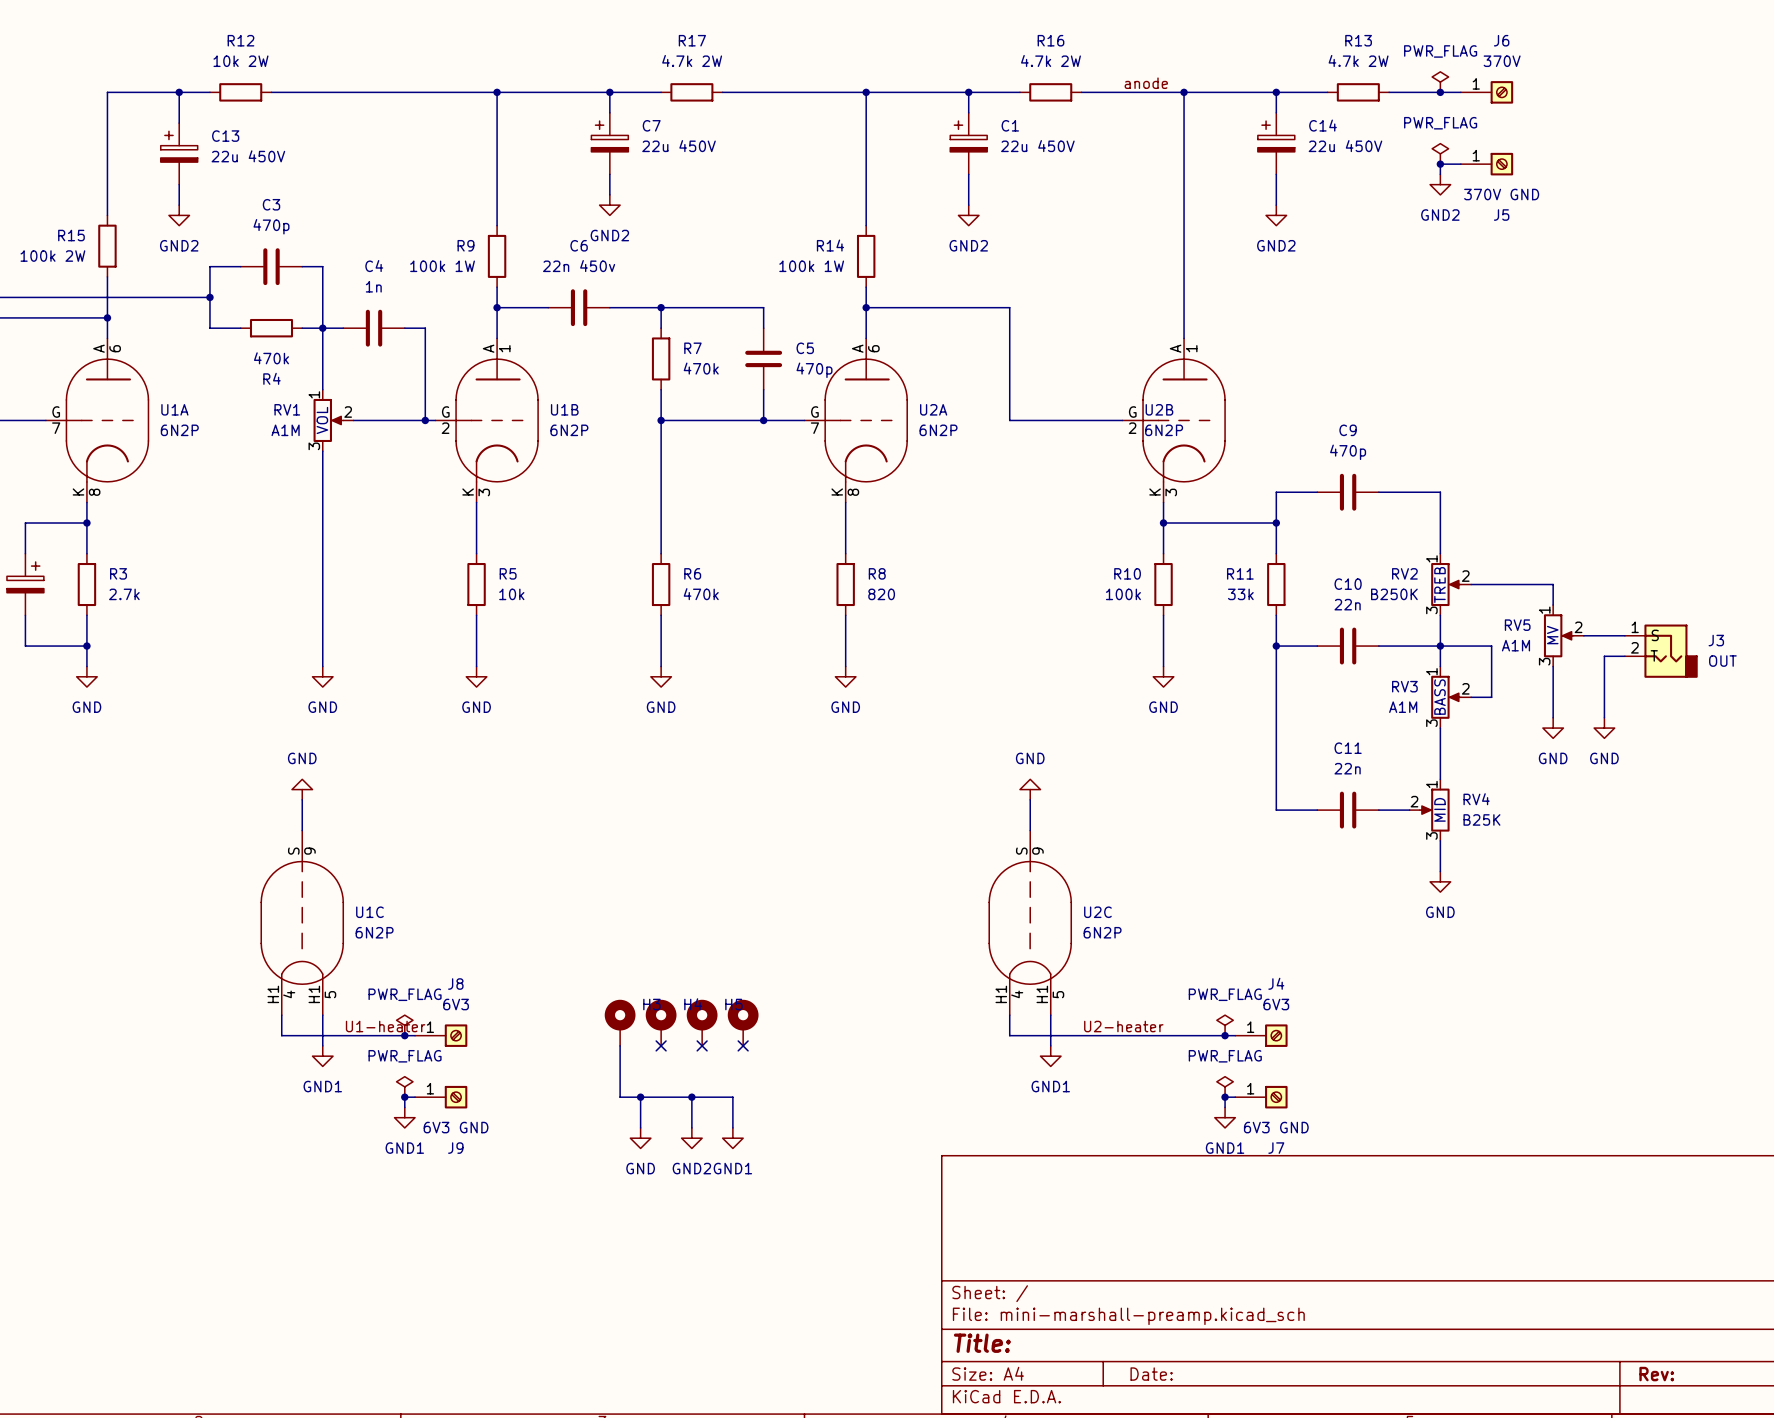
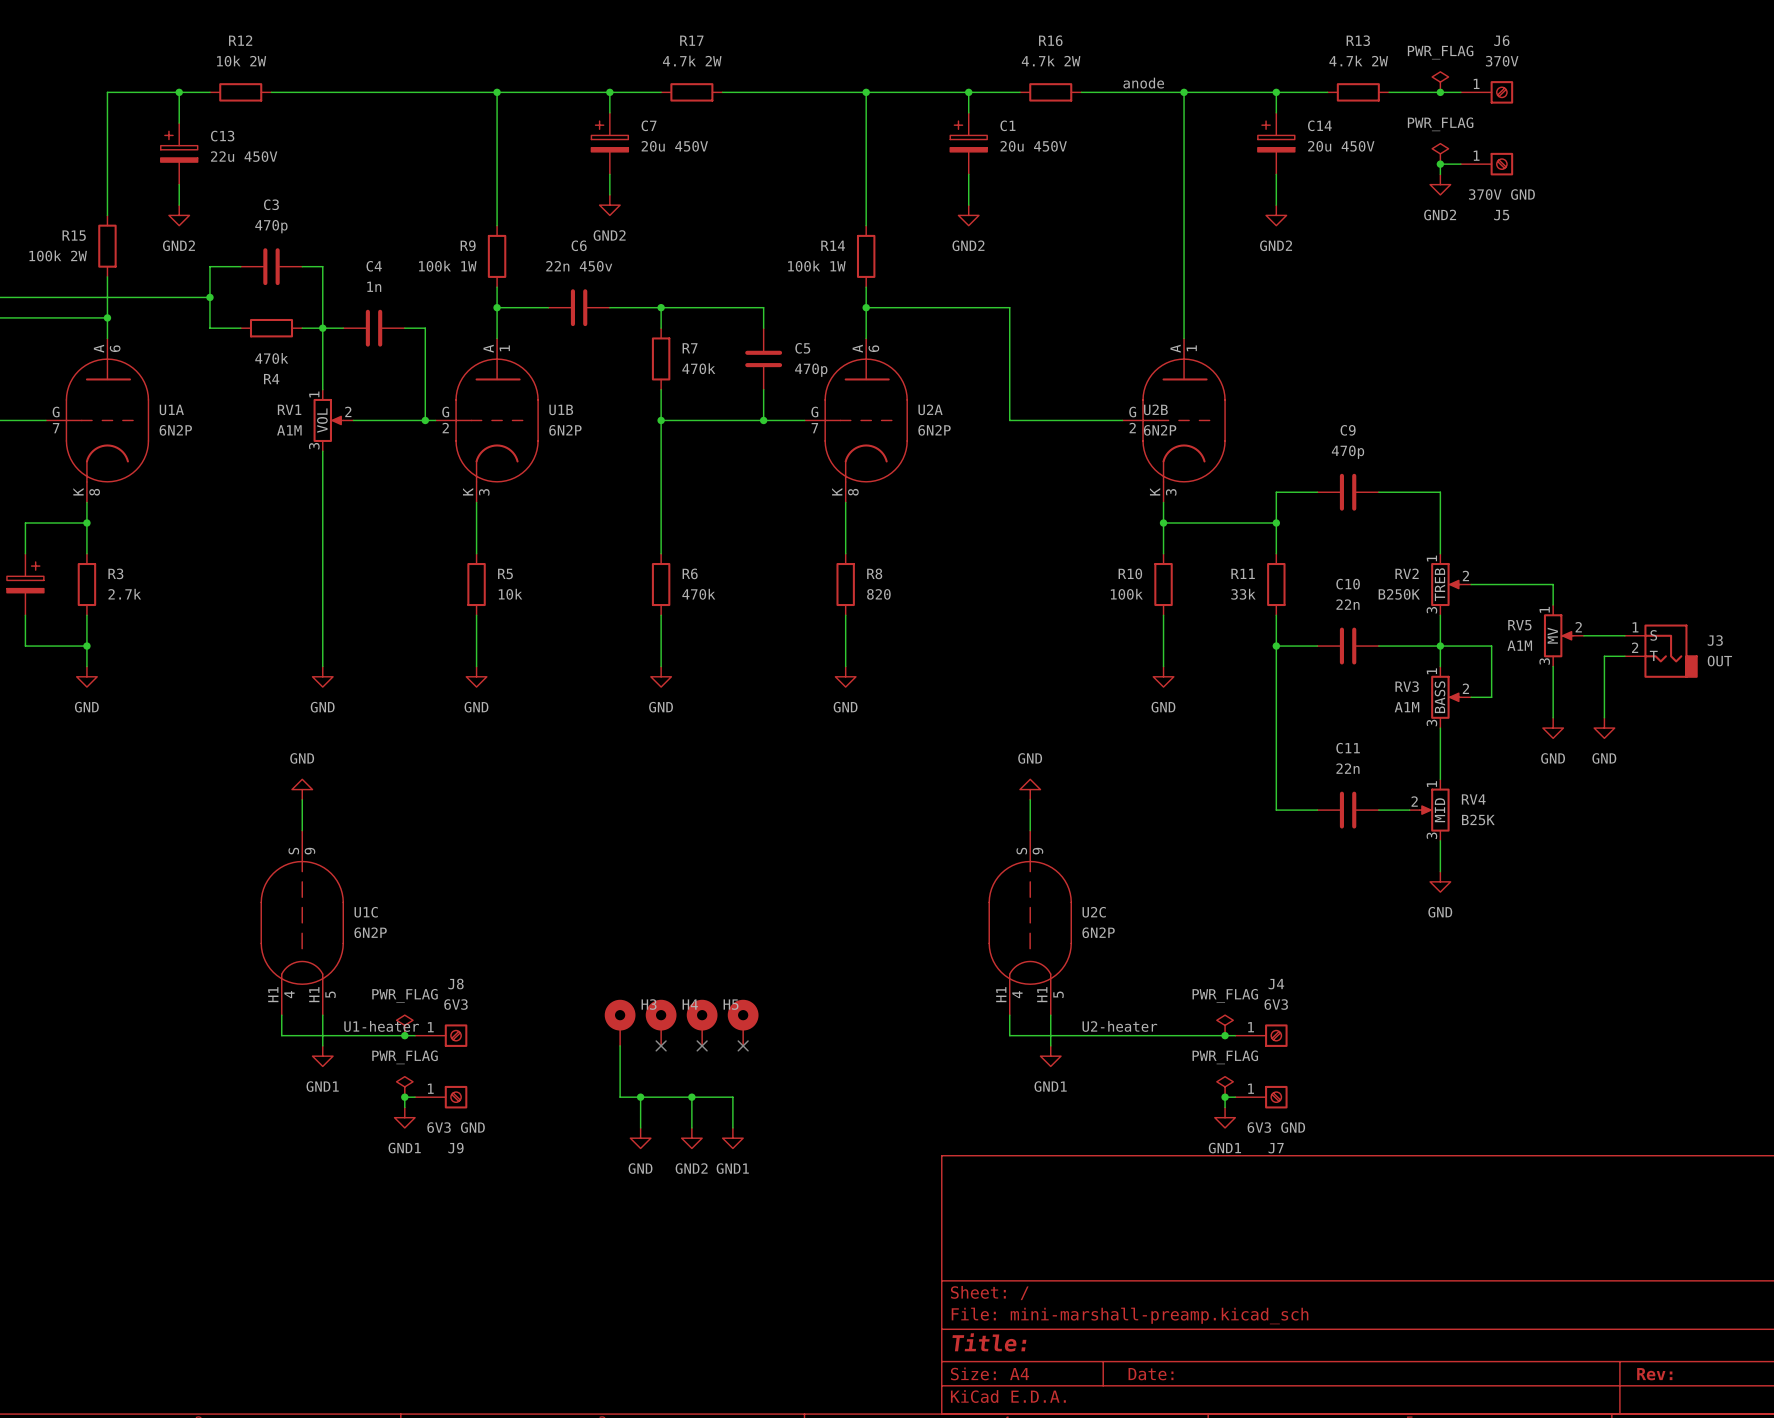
C7 value: 22u 450V (679, 146) -> 20u 450V (674, 146)
C1 value: 22u 450V (1037, 146) -> 20u 450V (1033, 146)
C14 value: 22u 450V (1345, 146) -> 20u 450V (1341, 146)

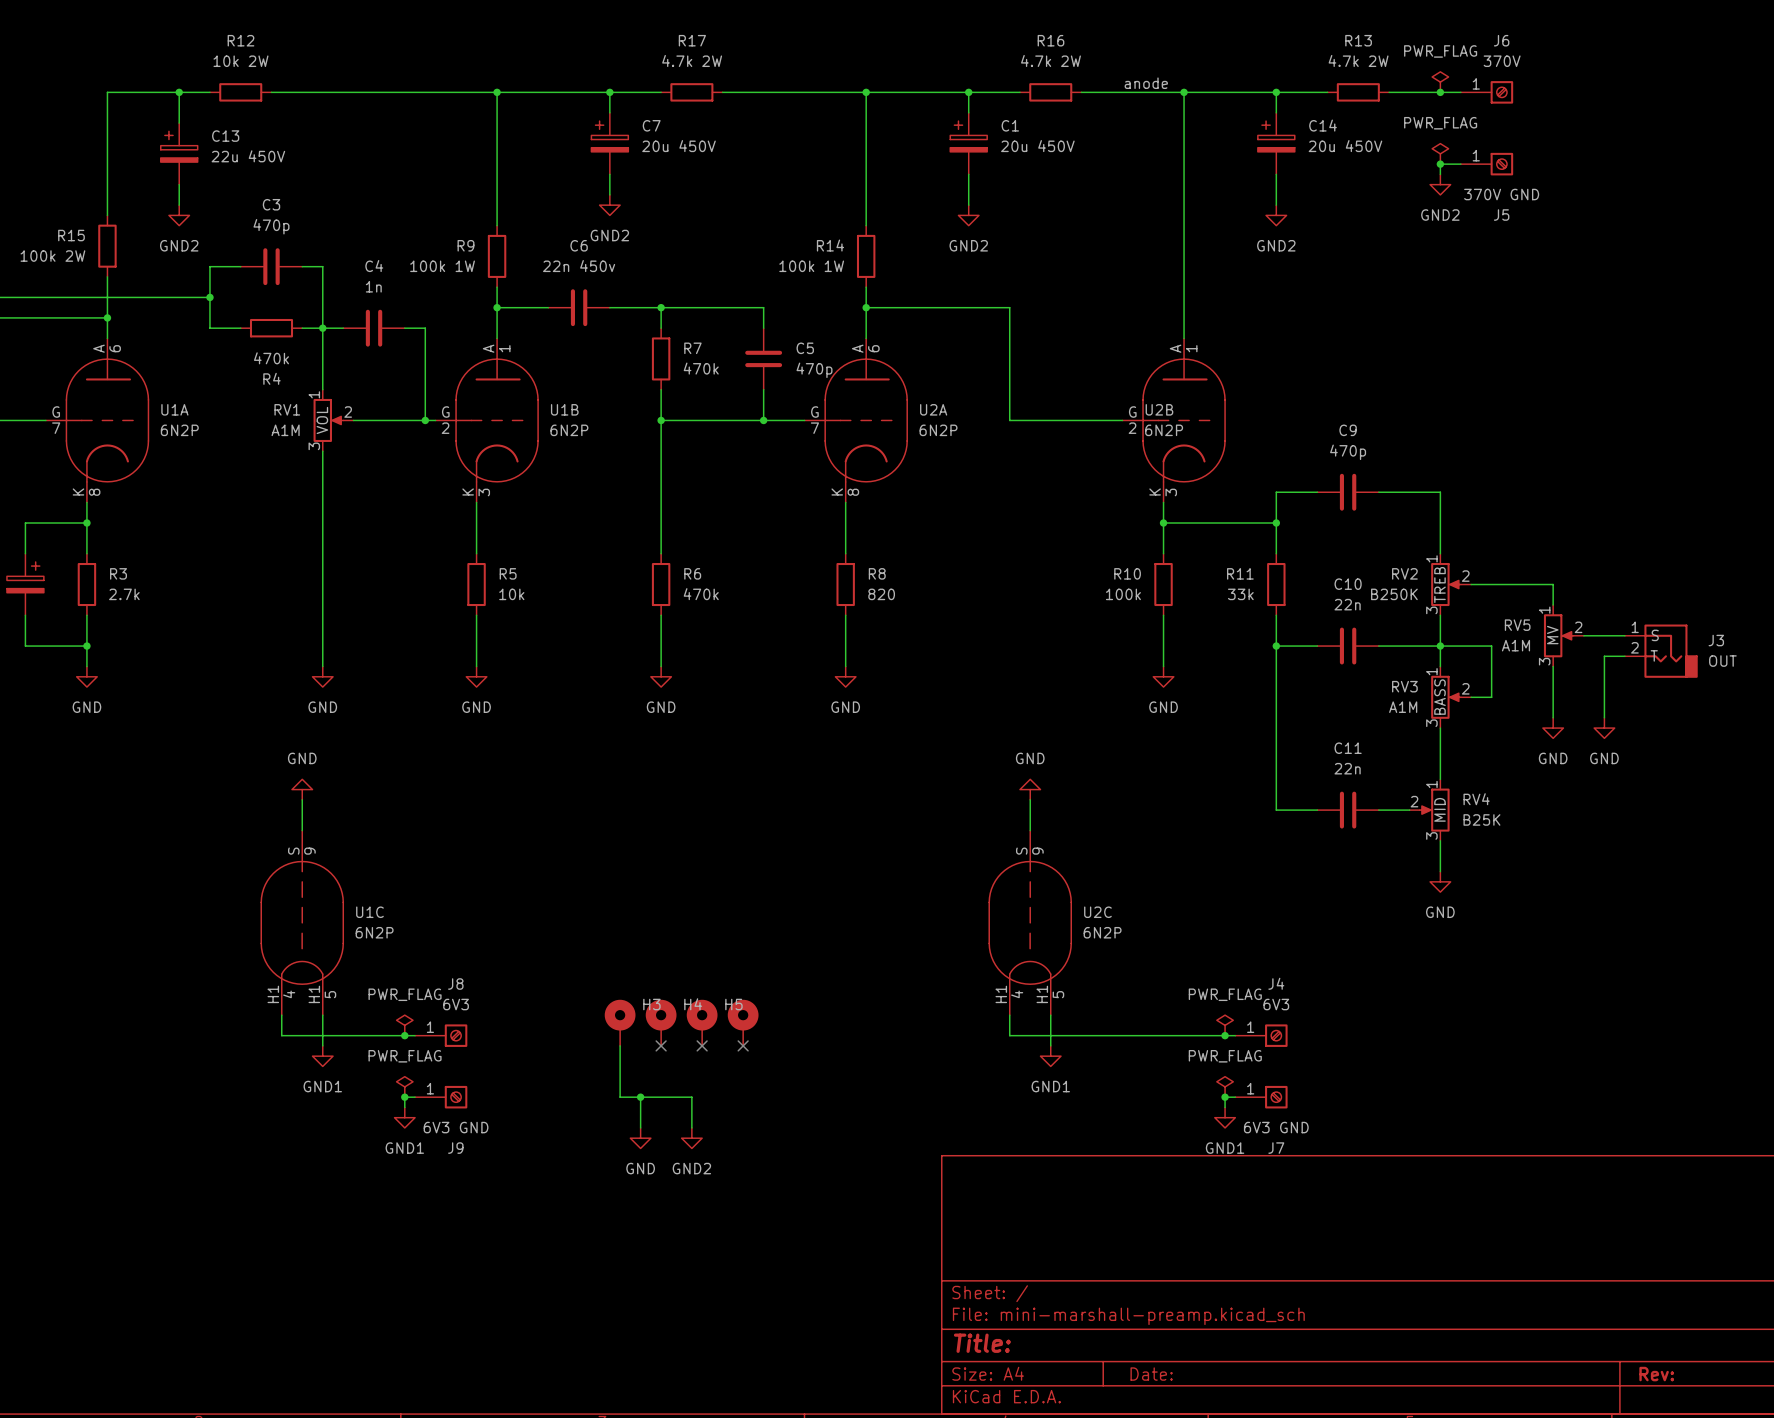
label: U1-heater (381, 1026) -> none
label: U2-heater (1119, 1026) -> none
wire: (691, 1097) (732, 1097) (732, 1127) -> none
junction: (691, 1097) -> none
power symbol: GND1 (732, 1138) -> none

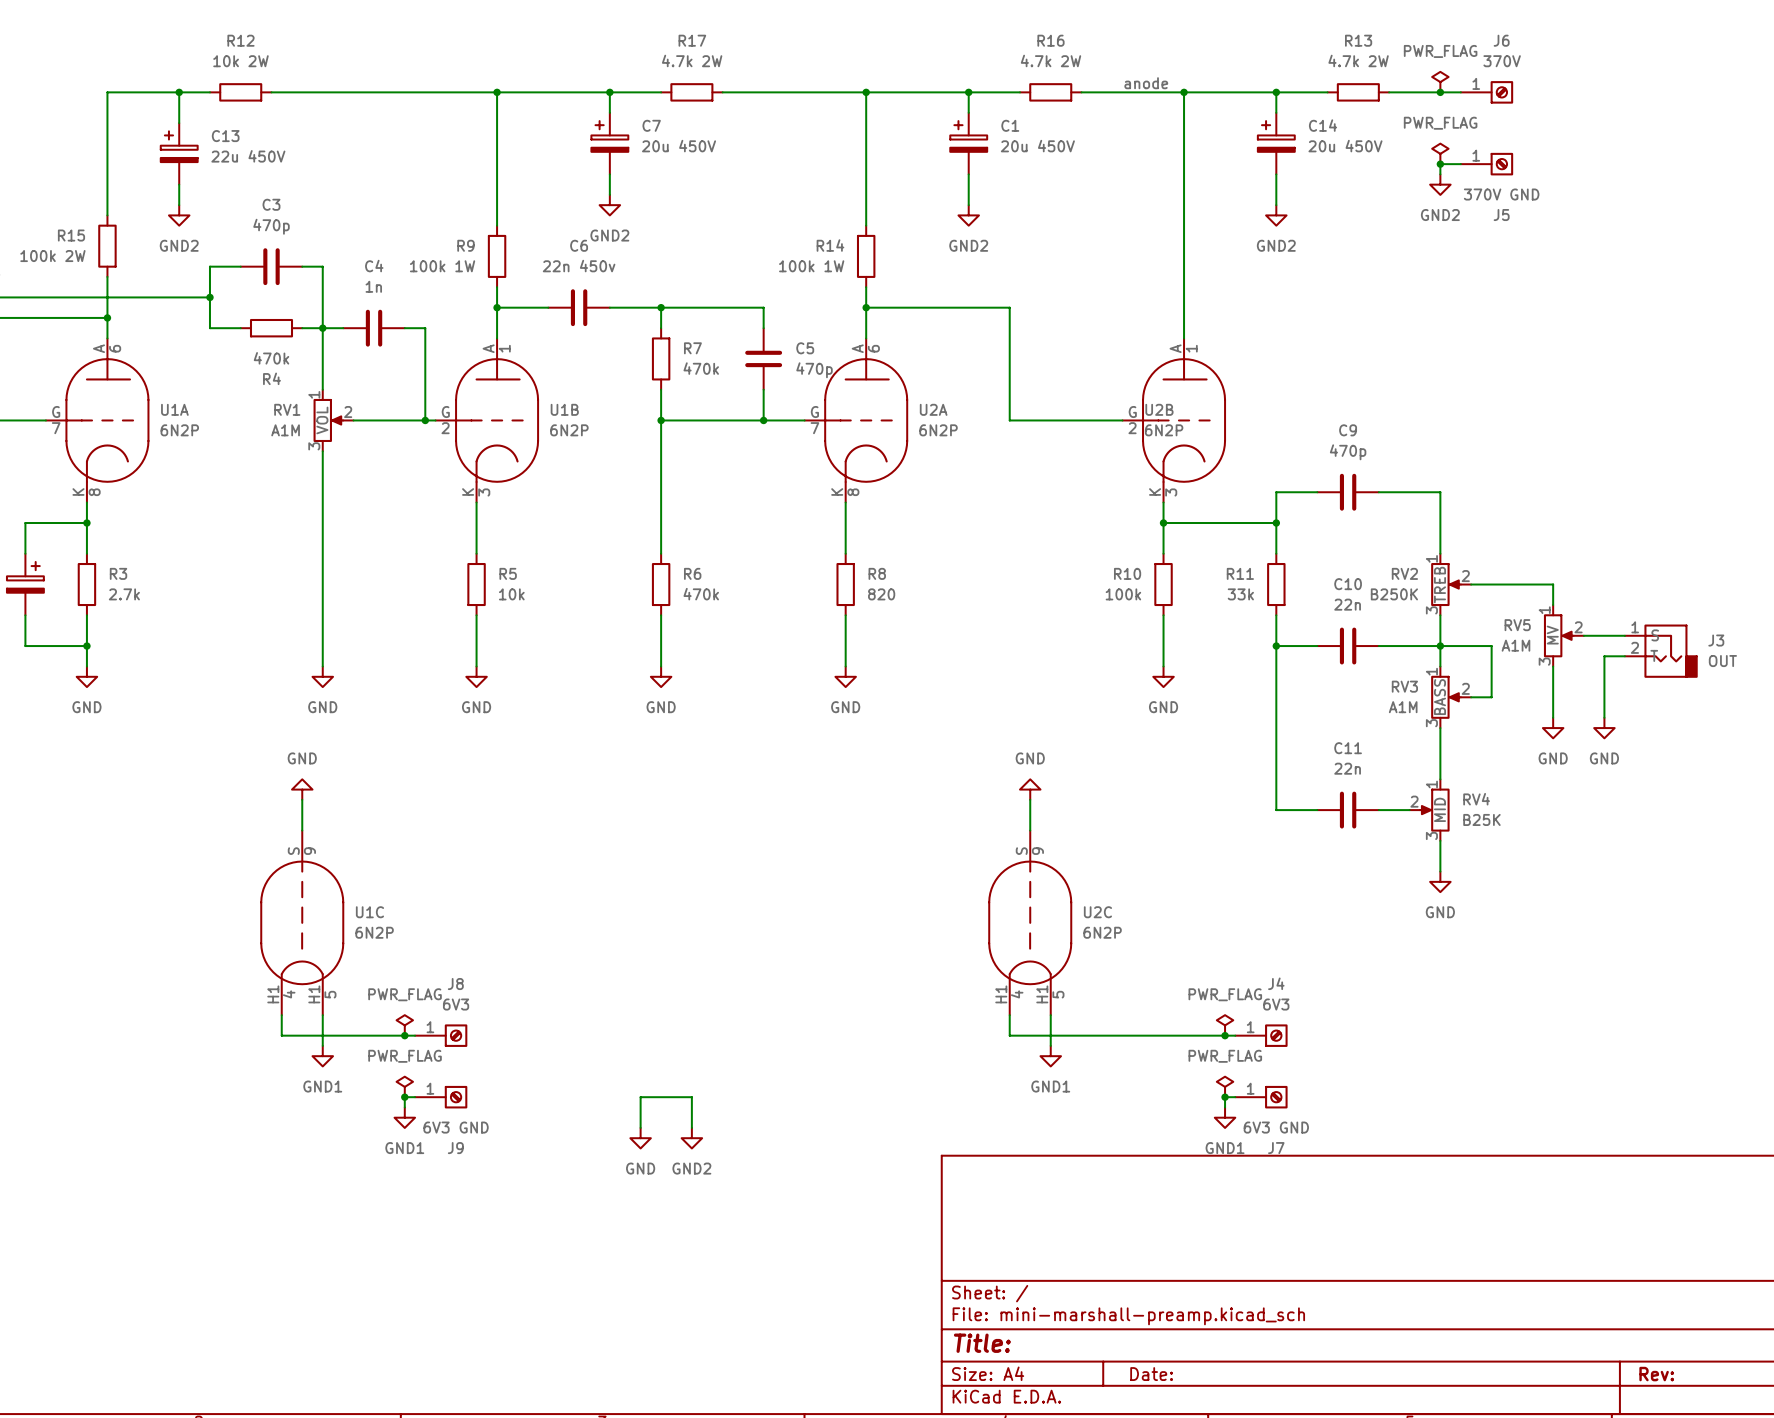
H3: (620, 1022) -> none
H4: (661, 1022) -> none
H5: (702, 1022) -> none
part: (743, 1022) -> none
wire: (620, 1045) (620, 1097) (640, 1097) -> none
no-connect mark: (661, 1045) -> none
no-connect mark: (702, 1045) -> none
no-connect mark: (743, 1045) -> none
junction: (640, 1097) -> none

